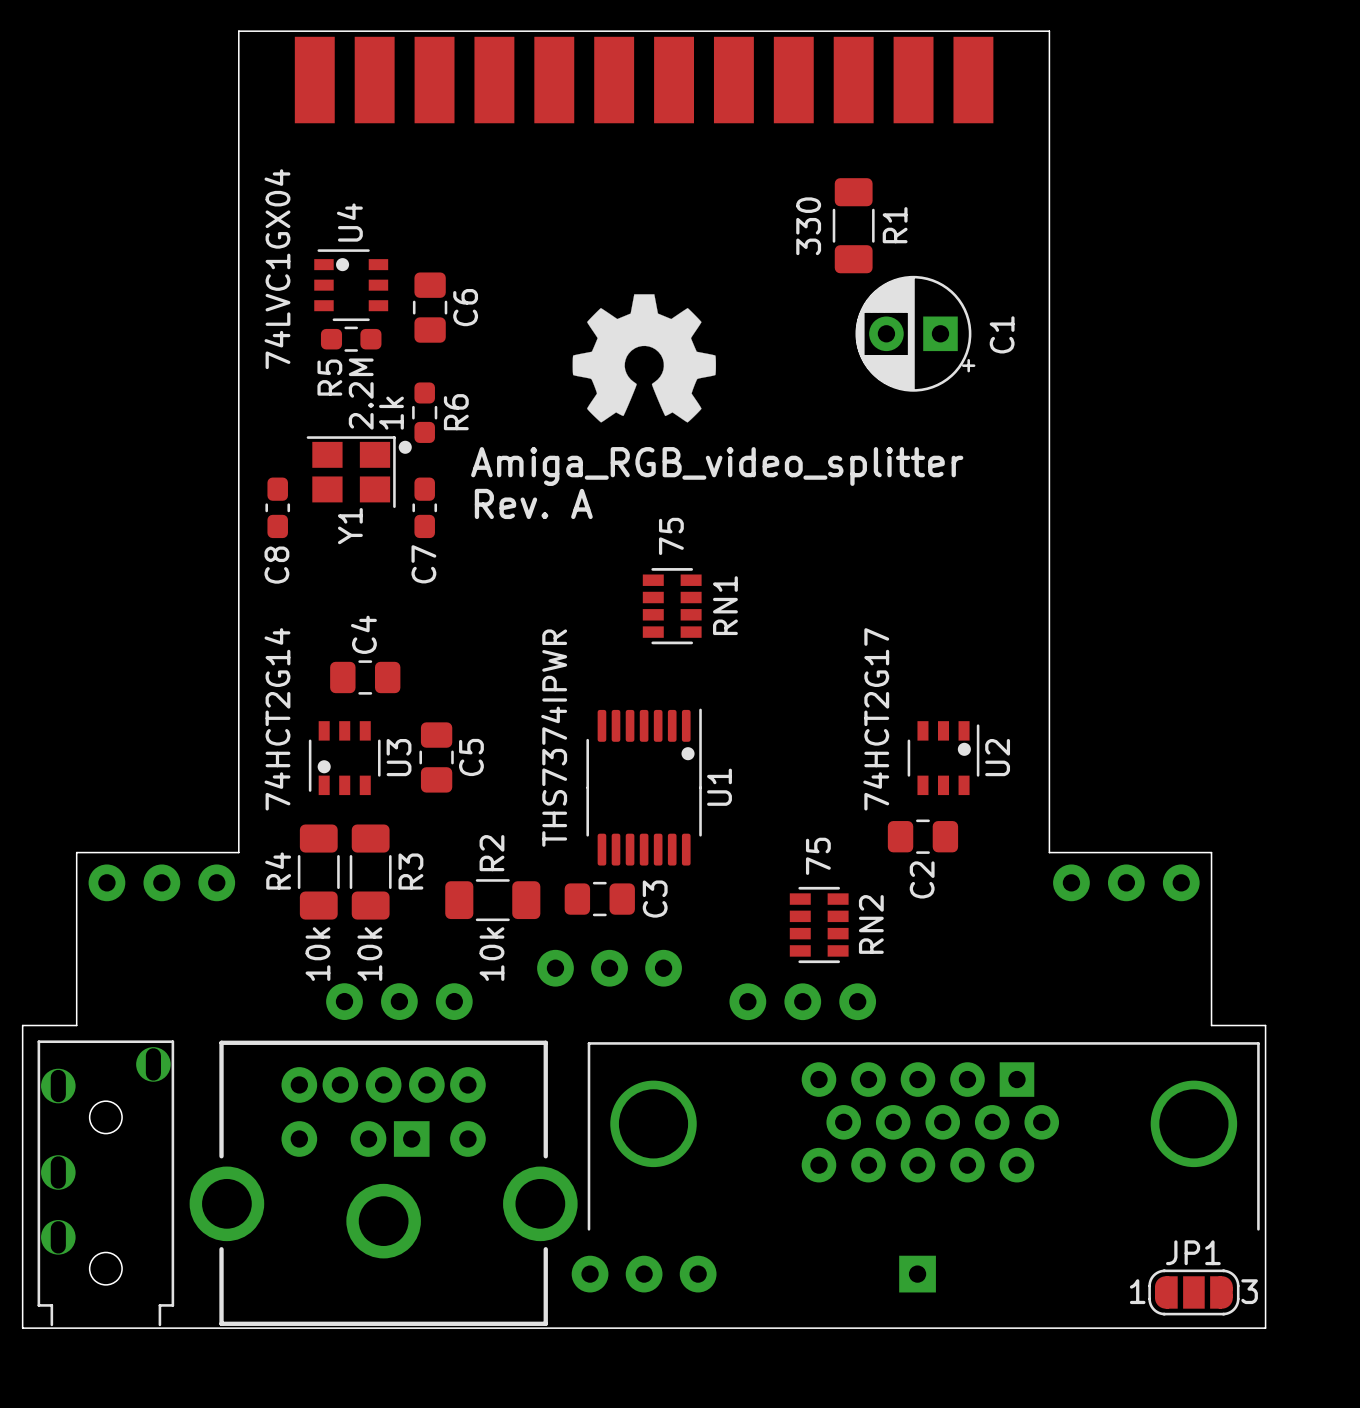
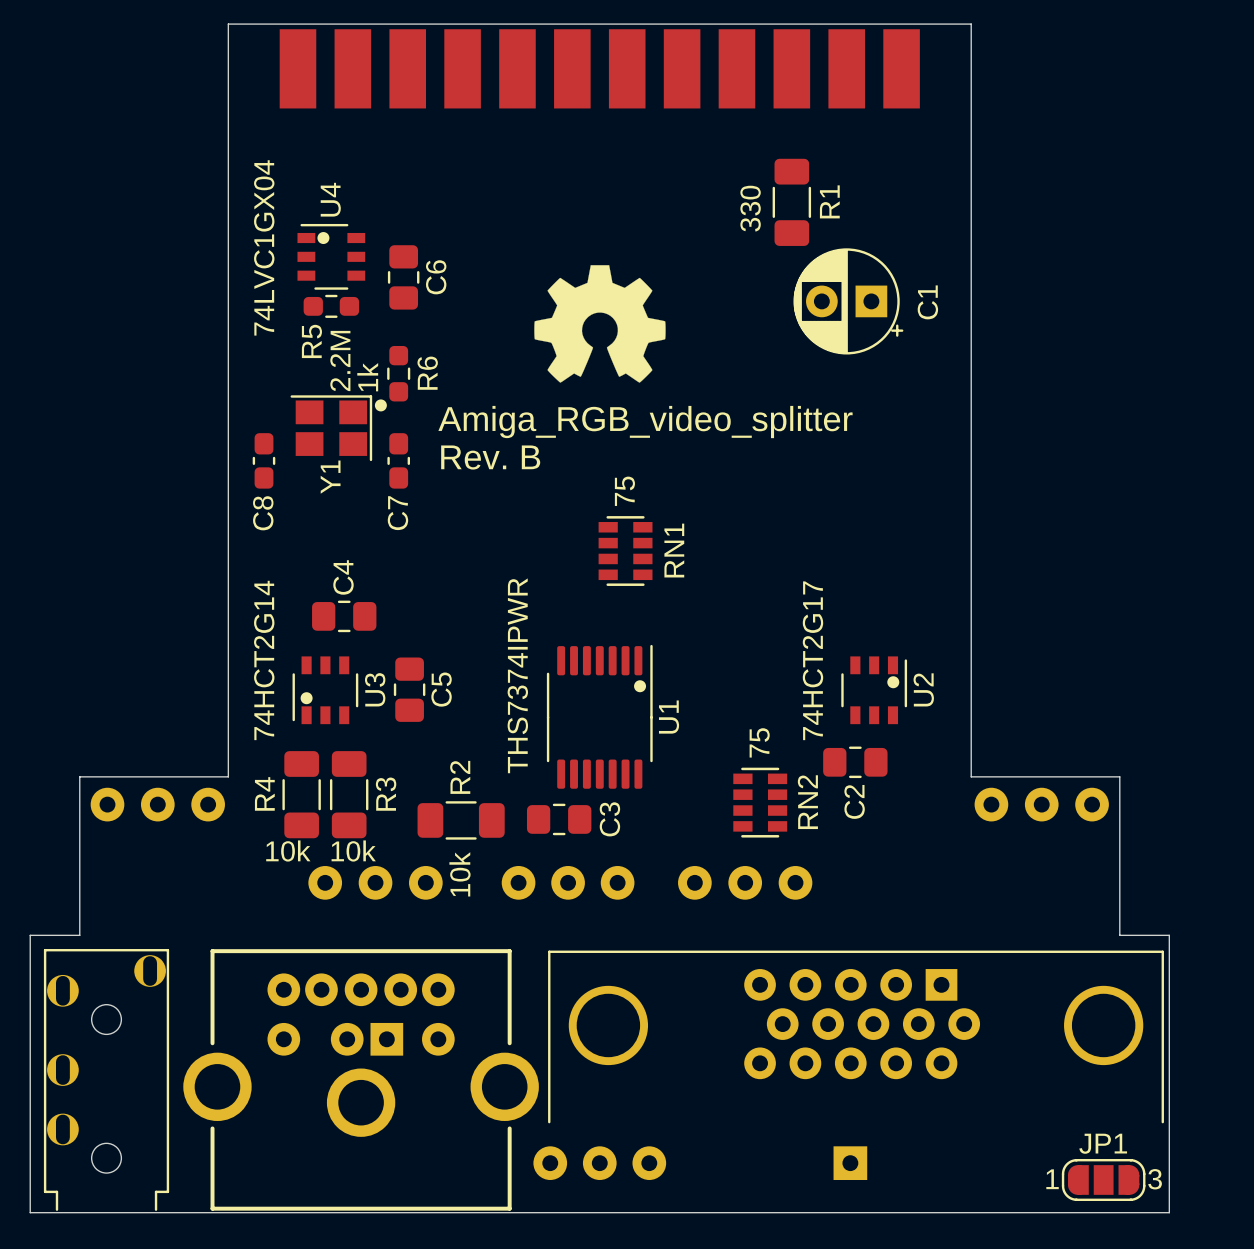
text: Rev. A (533, 503) -> Rev. B (490, 457)
text position: 75 (818, 856) -> 75 (759, 742)
RN2 position: (819, 924) -> (760, 802)
text: none -> 10k (288, 851)
text: none -> 10k (353, 851)
text: 10k (317, 954) -> none
text: 10k (369, 954) -> none
part position: (399, 1001) -> (375, 882)
part position: (802, 1001) -> (745, 882)
part footprint: [189, 1040, 578, 1326] -> [183, 949, 539, 1211]

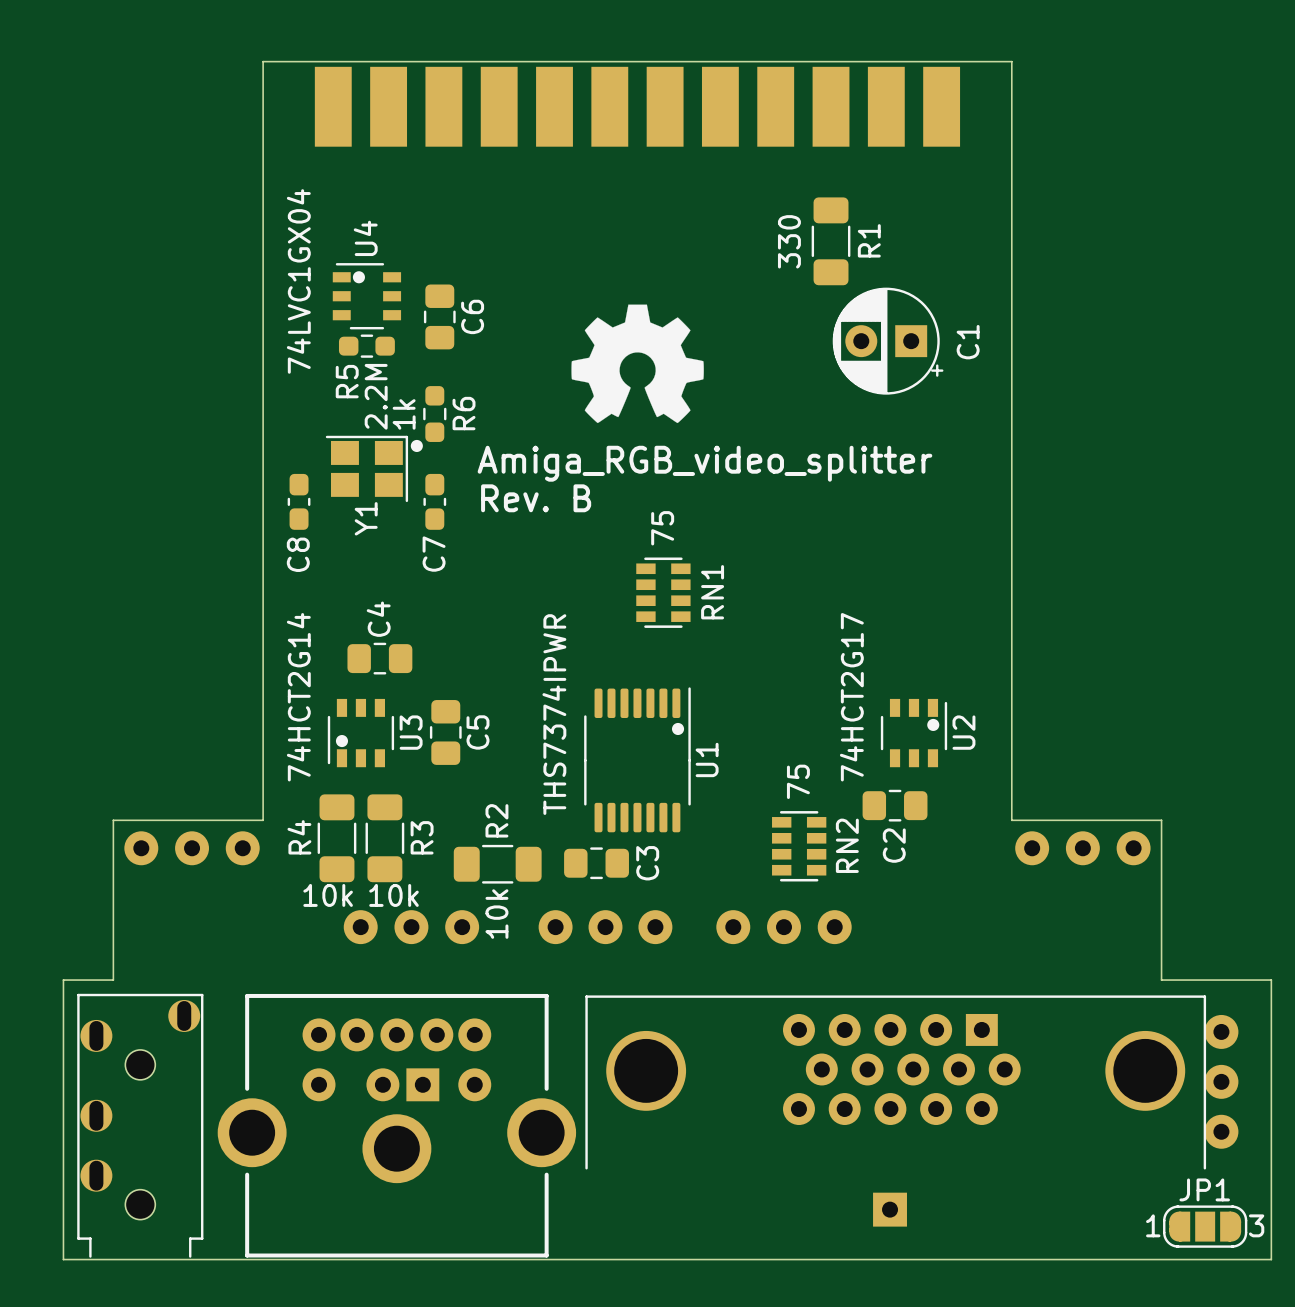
board edge: (1169, 935) (1169, 1212) -> (1211, 980) (1271, 980) (1271, 1259) (1211, 1259)
part: none -> (1221, 1081)
part: (599, 1163) -> none
JP1 position: (1103, 1179) -> (1205, 1226)

